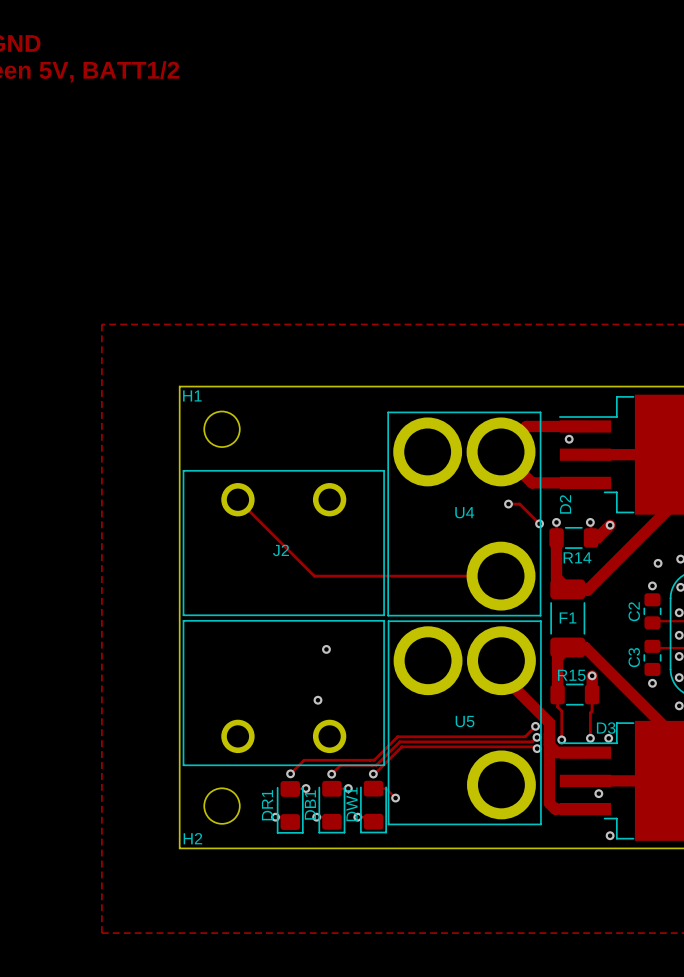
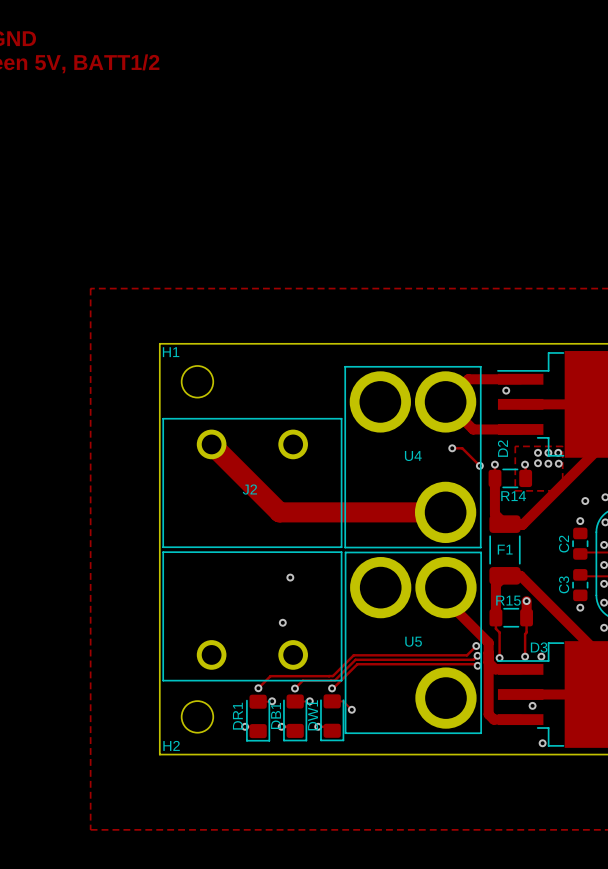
track width: thin (237, 499) (314, 576) (501, 576) -> thick (211, 444) (279, 512) (445, 512)
zone outline: none -> (515, 446) (515, 490) (562, 490) (562, 446) (515, 446)
via: none -> (538, 452)
via: none -> (548, 452)
via: none -> (558, 452)
via: none -> (538, 463)
via: none -> (548, 463)
via: none -> (558, 463)
track: (610, 525) (597, 537) (591, 537) -> none
via: (610, 525) -> none

